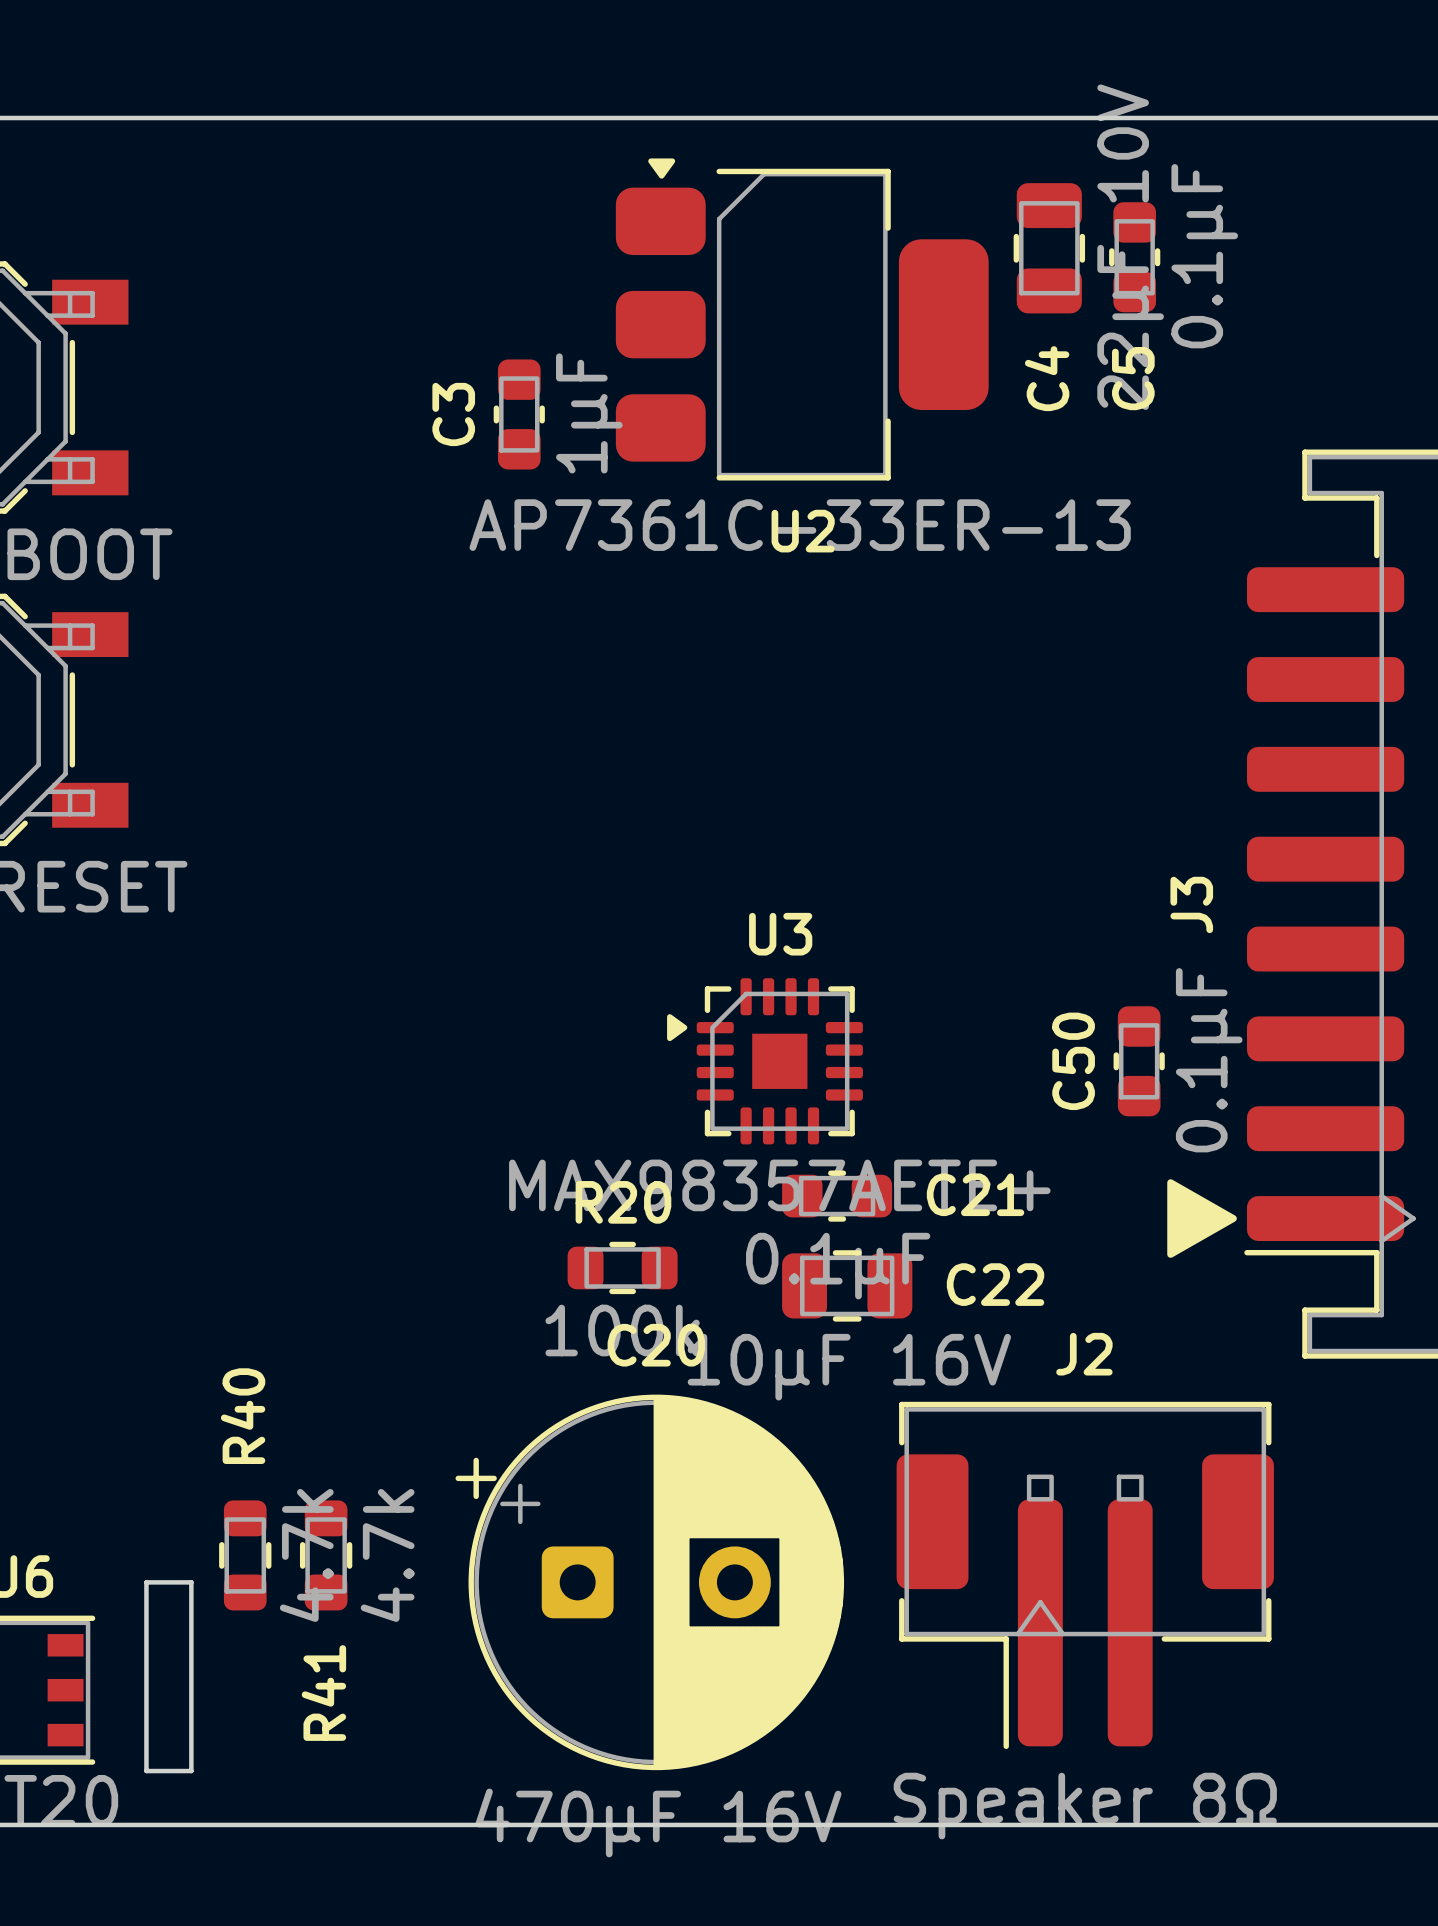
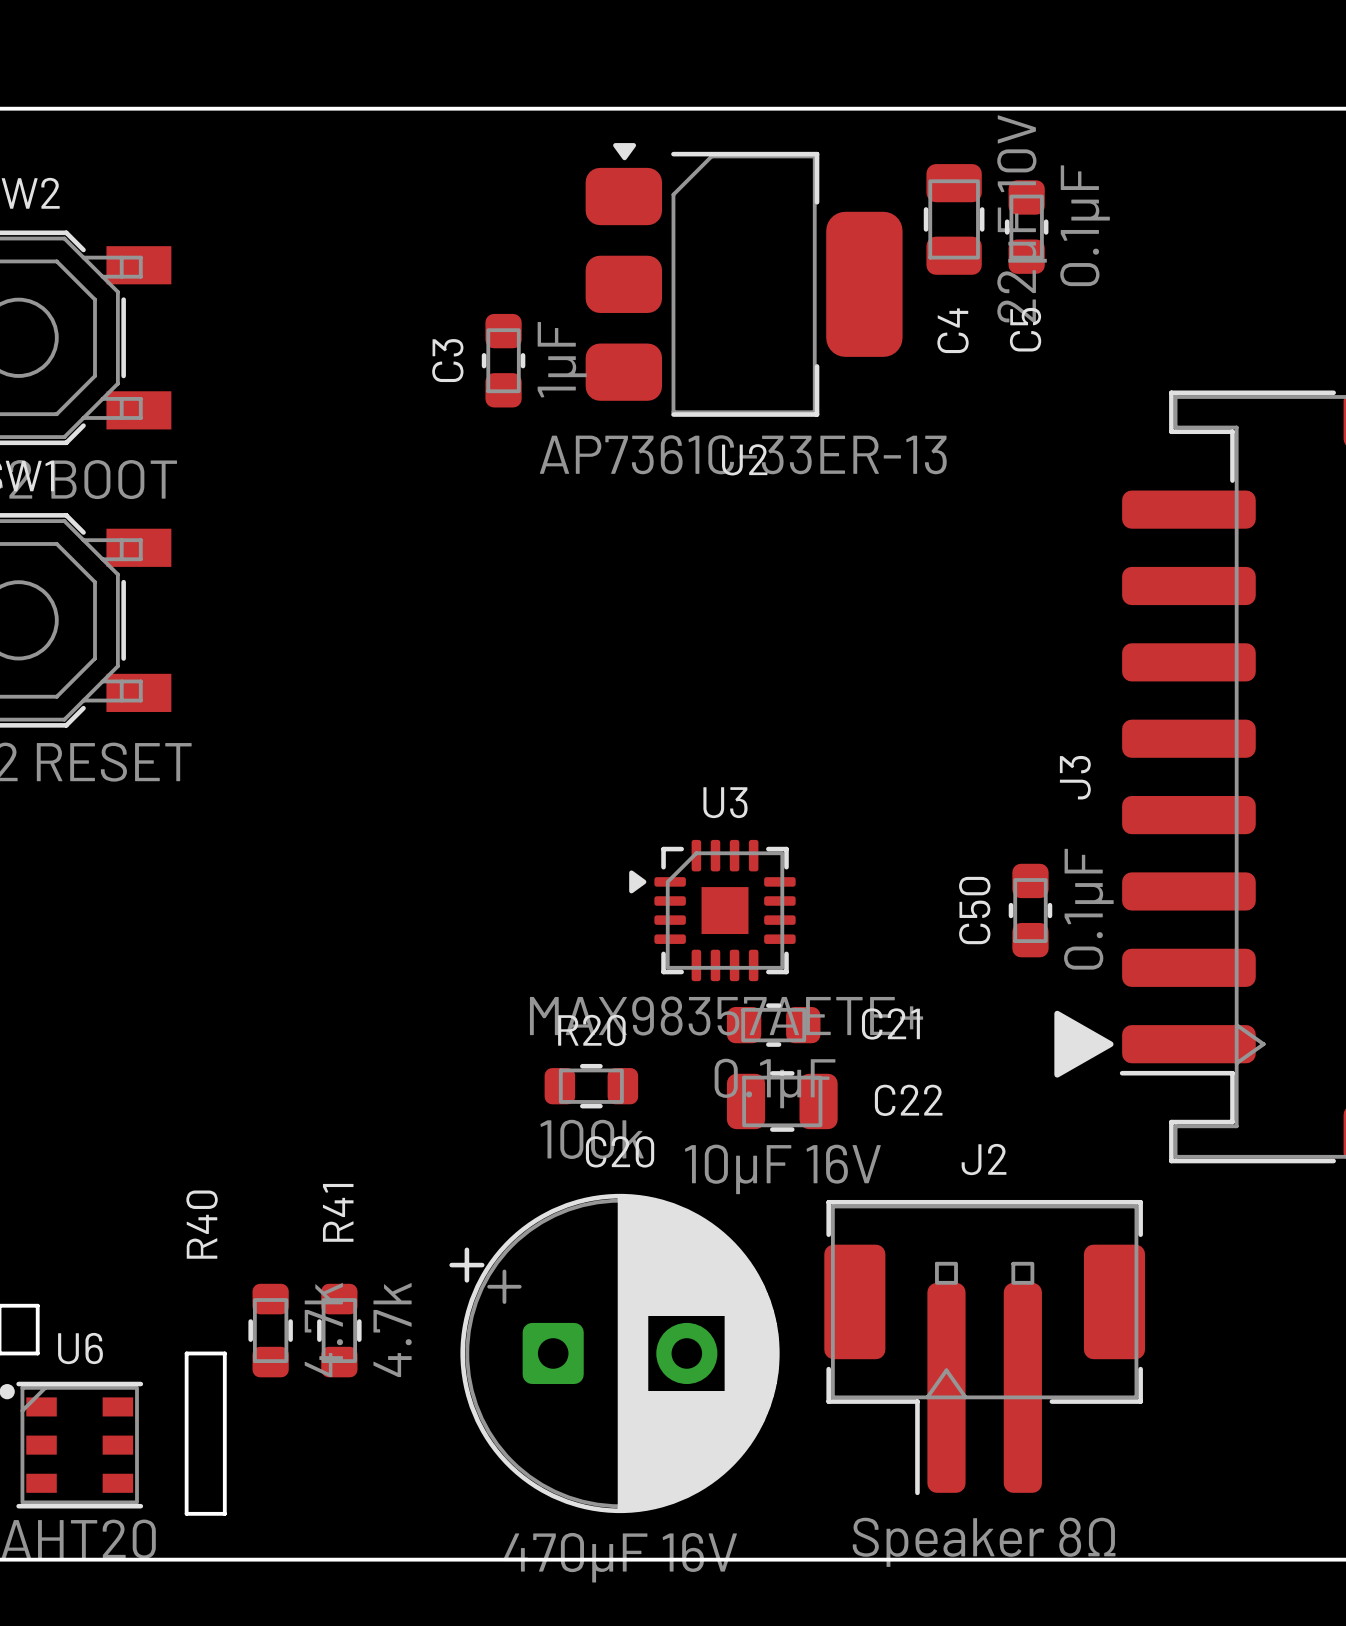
R40 name position: R40 (243, 1416) -> R40 (202, 1224)
R41 name position: R41 (323, 1693) -> R41 (338, 1212)

